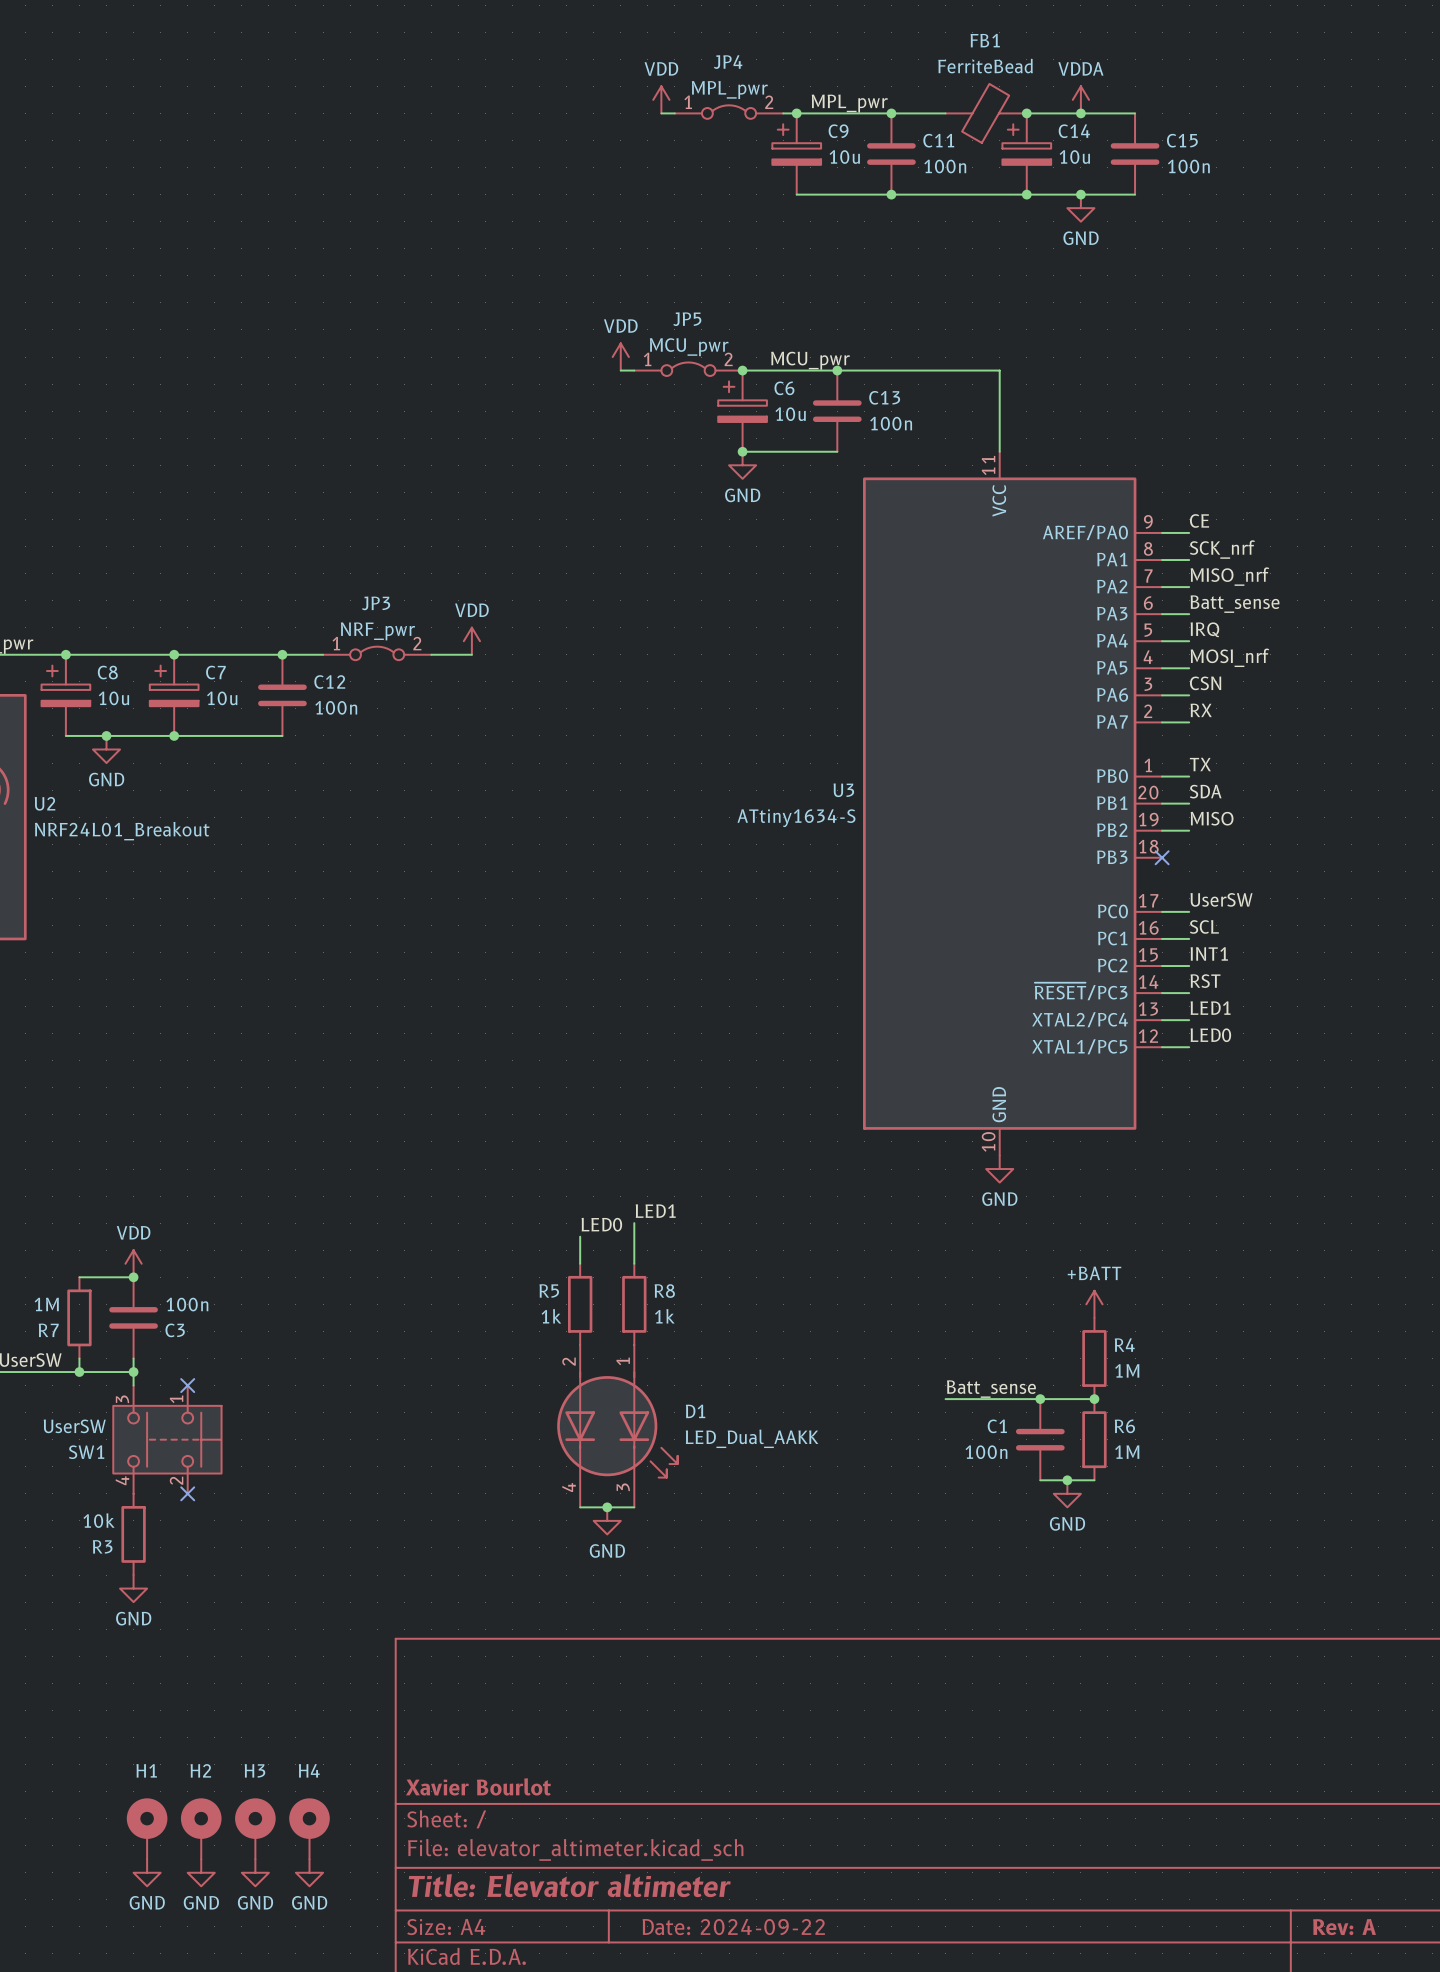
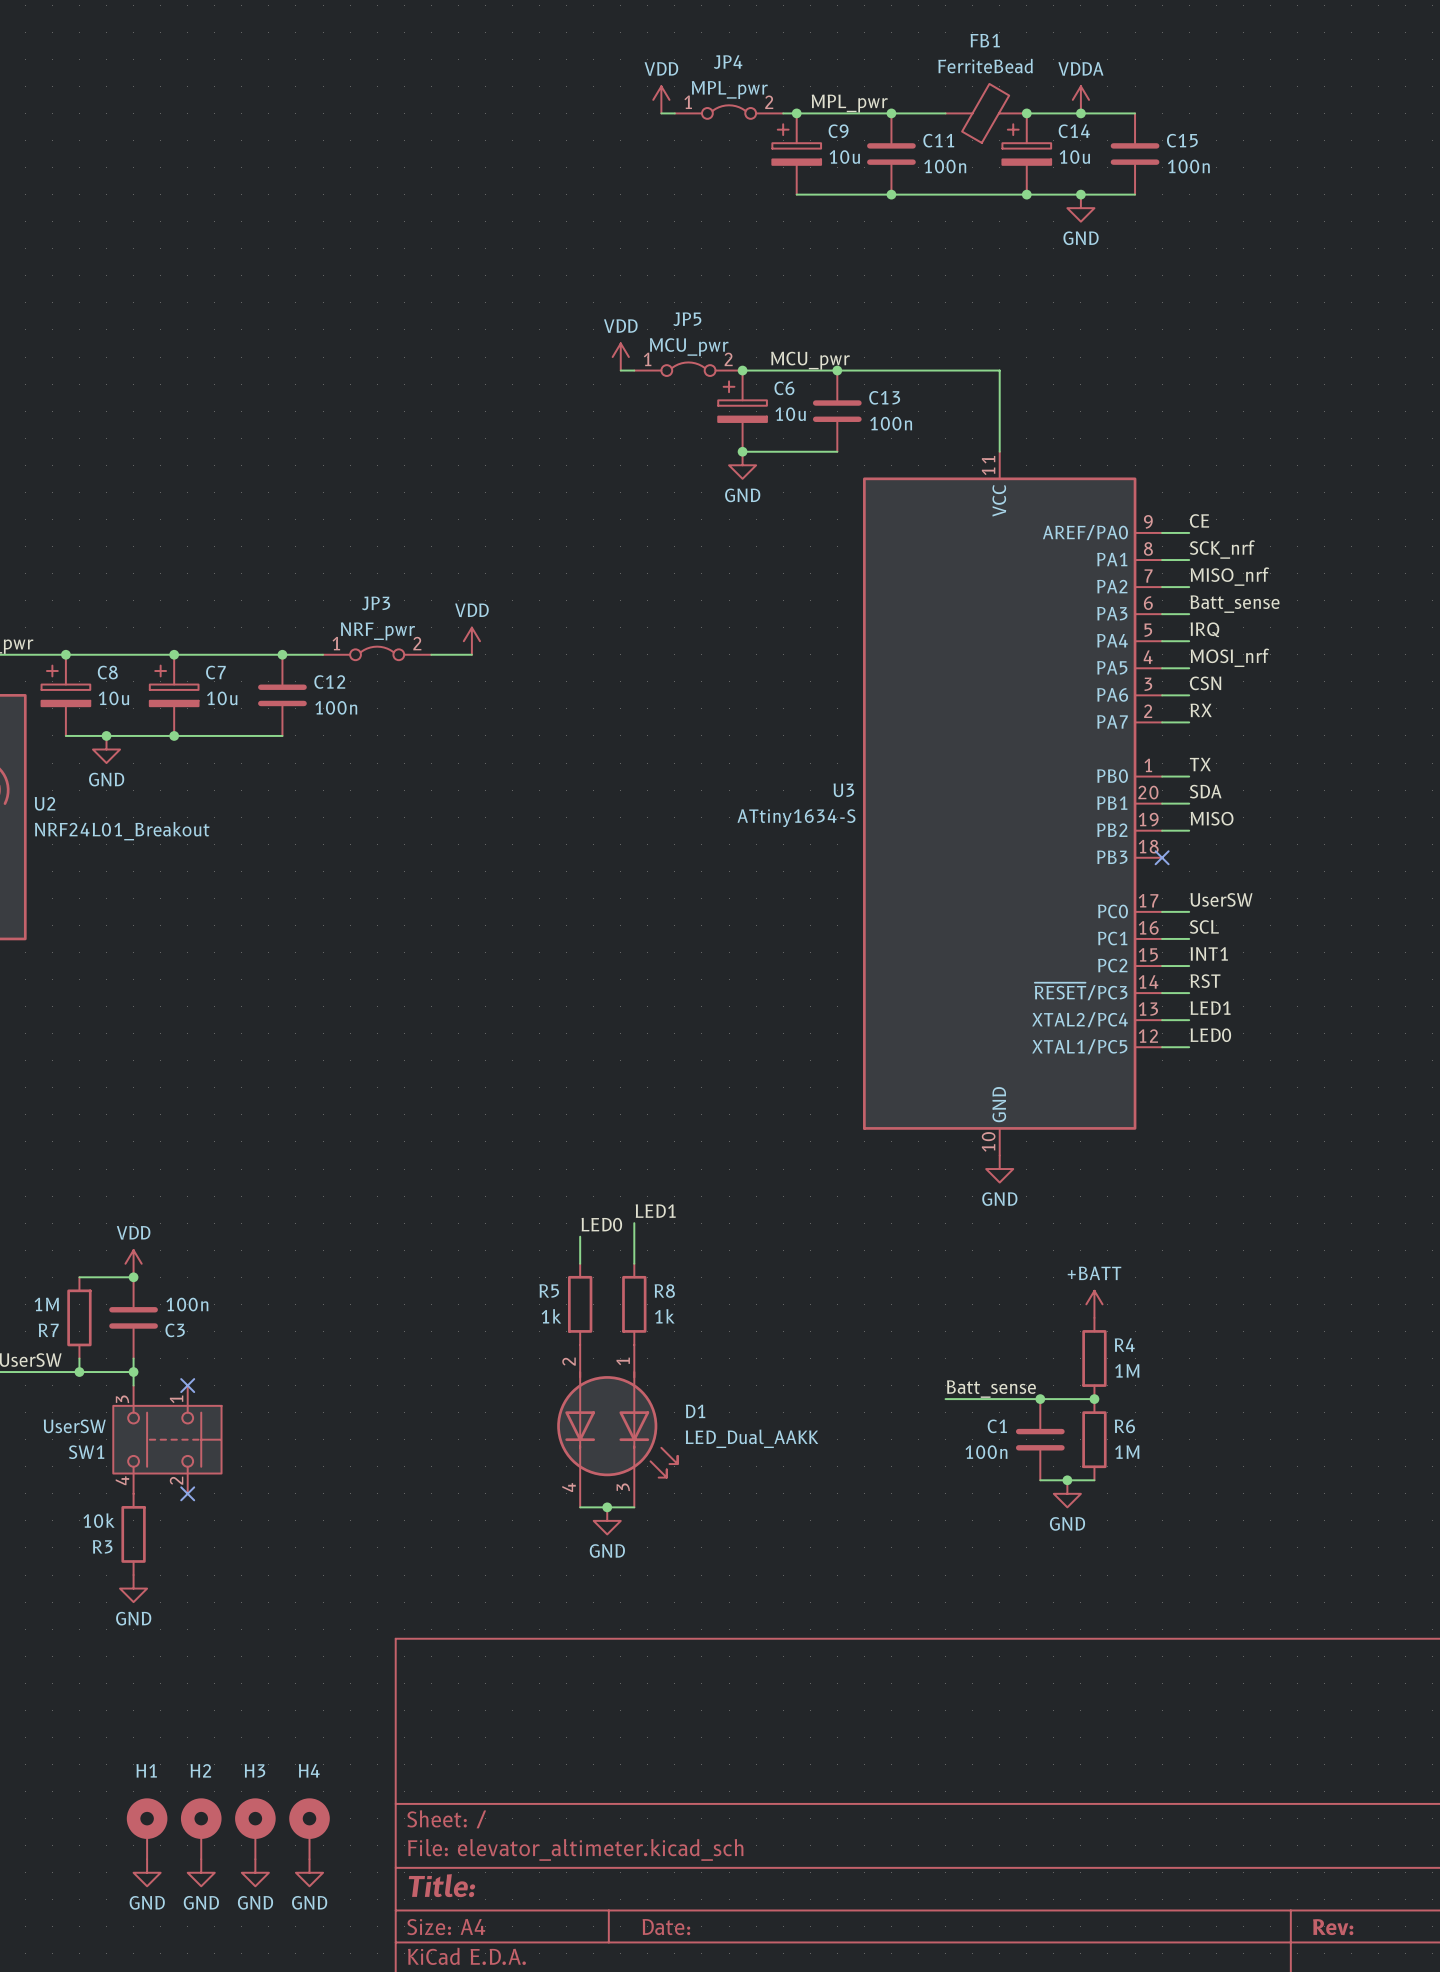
title block: Xavier Bourlot (478, 1786) -> none
title block: Title: Elevator altimeter (569, 1885) -> Title: (441, 1885)
title block: Date: 2024-09-22 (733, 1927) -> Date: (666, 1927)
title block: Rev: A (1344, 1927) -> Rev: (1333, 1927)

